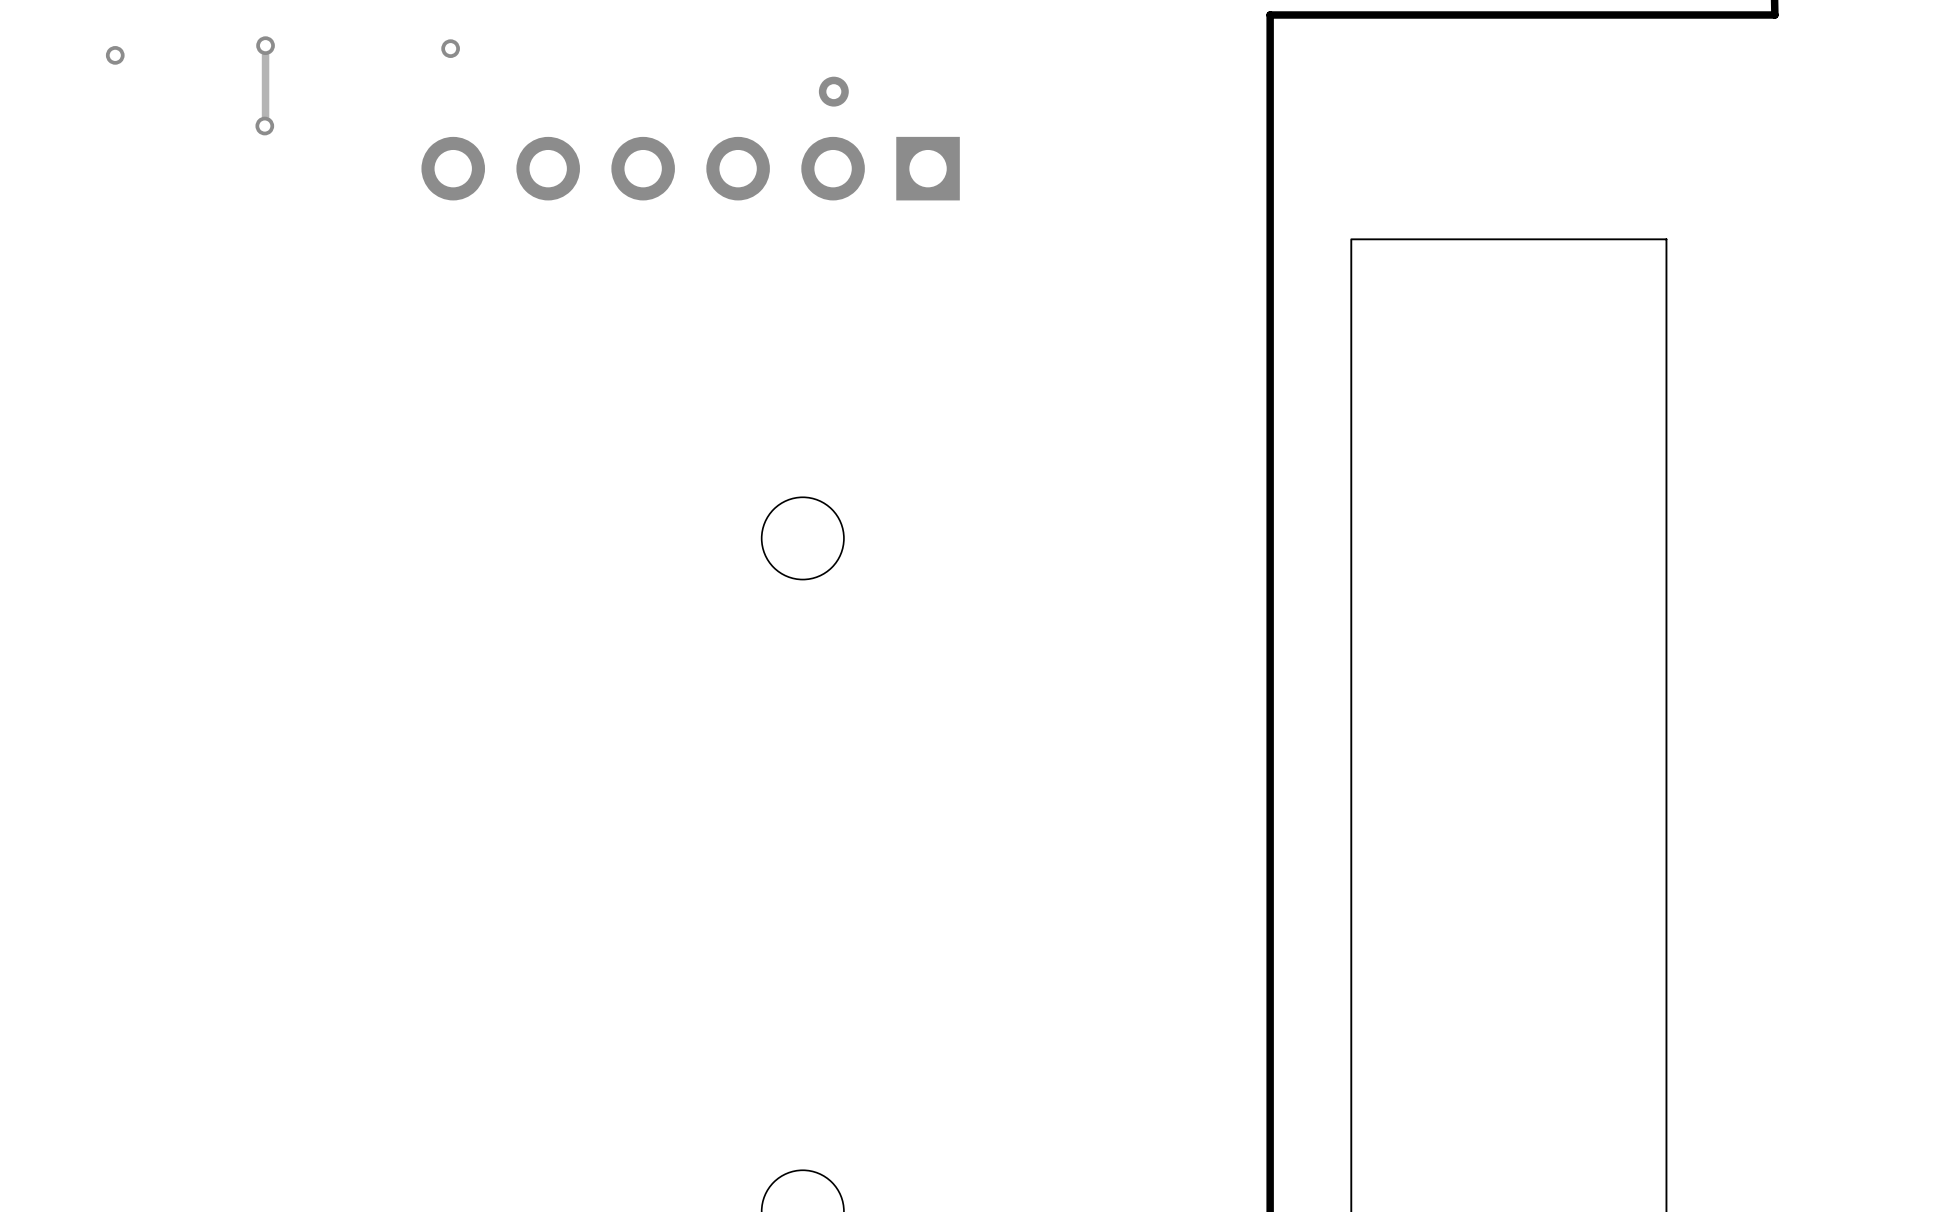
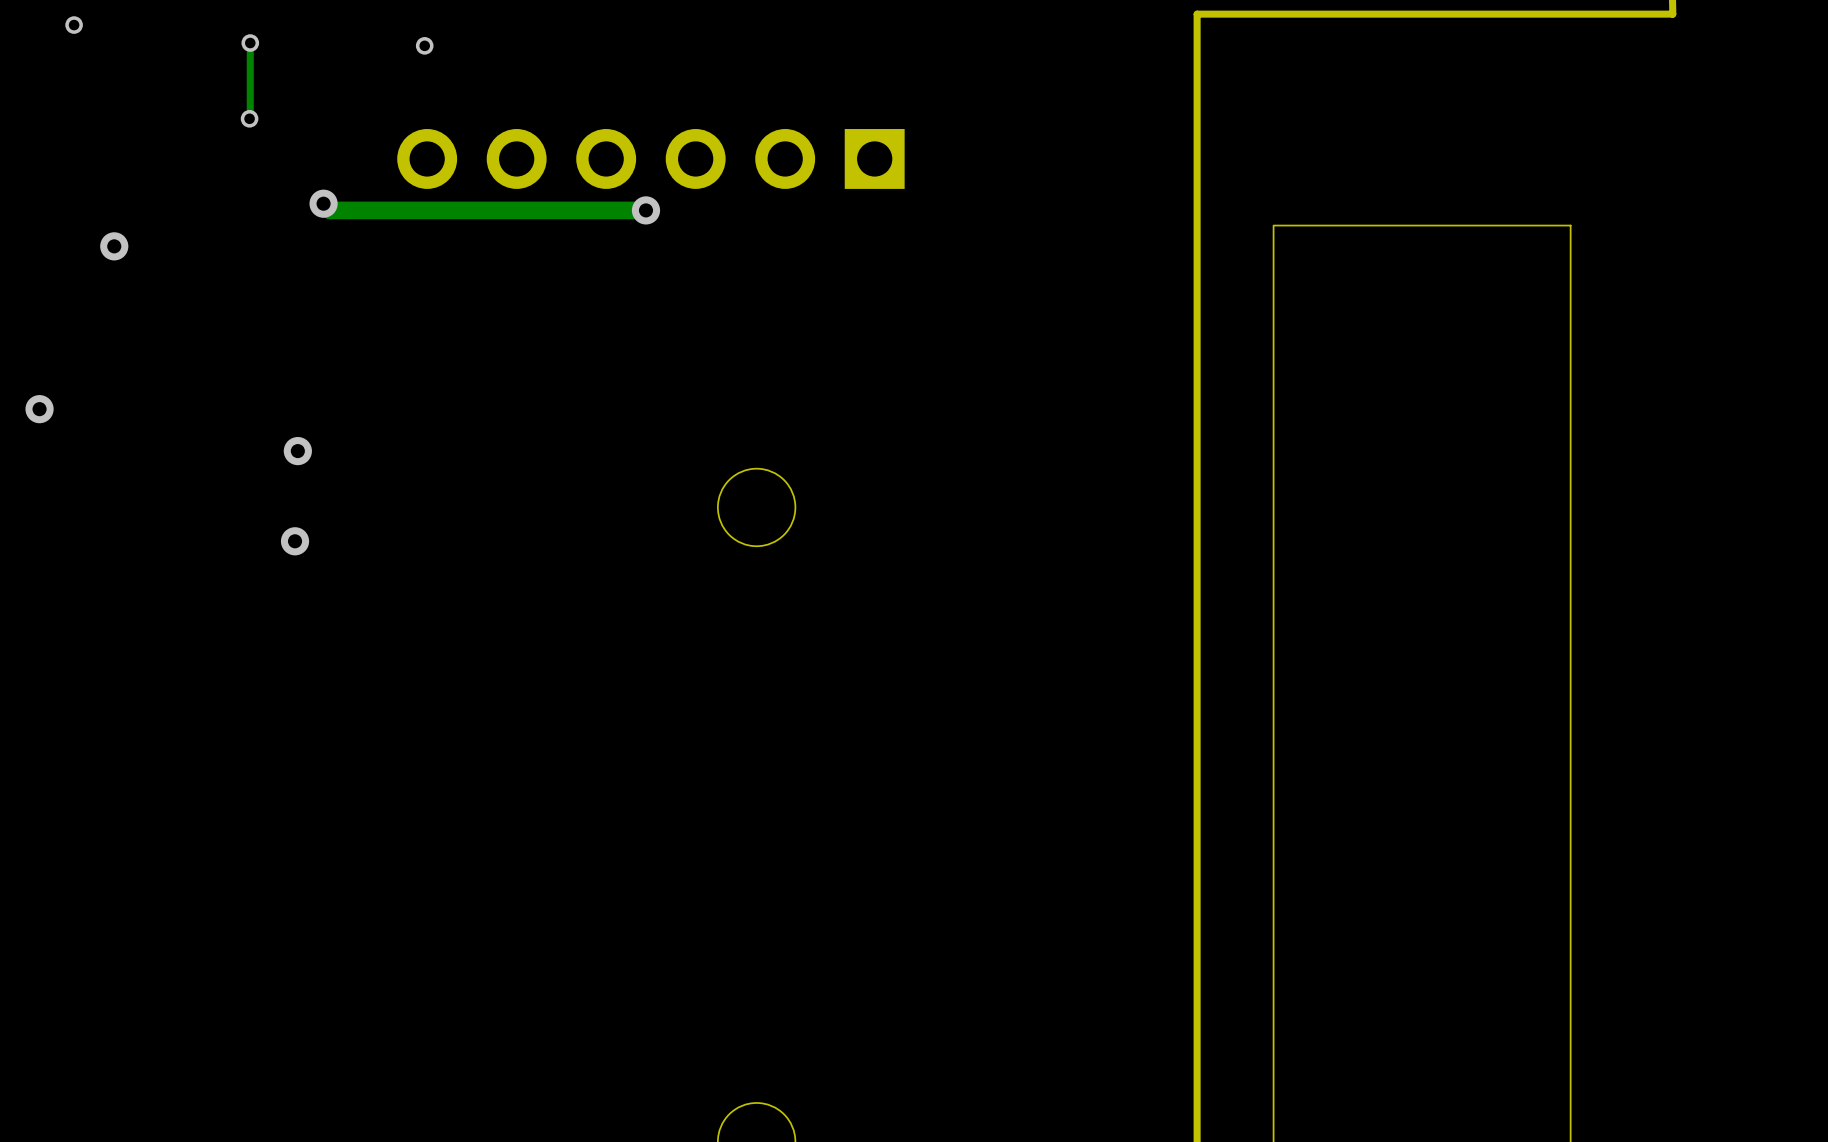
via position: (115, 55) -> (74, 25)
via position: (833, 91) -> (645, 210)
track: none -> (323, 203) (330, 210) (645, 210)
via: none -> (323, 203)
via: none -> (114, 246)
via: none -> (39, 409)
via: none -> (297, 451)
via: none -> (295, 541)

